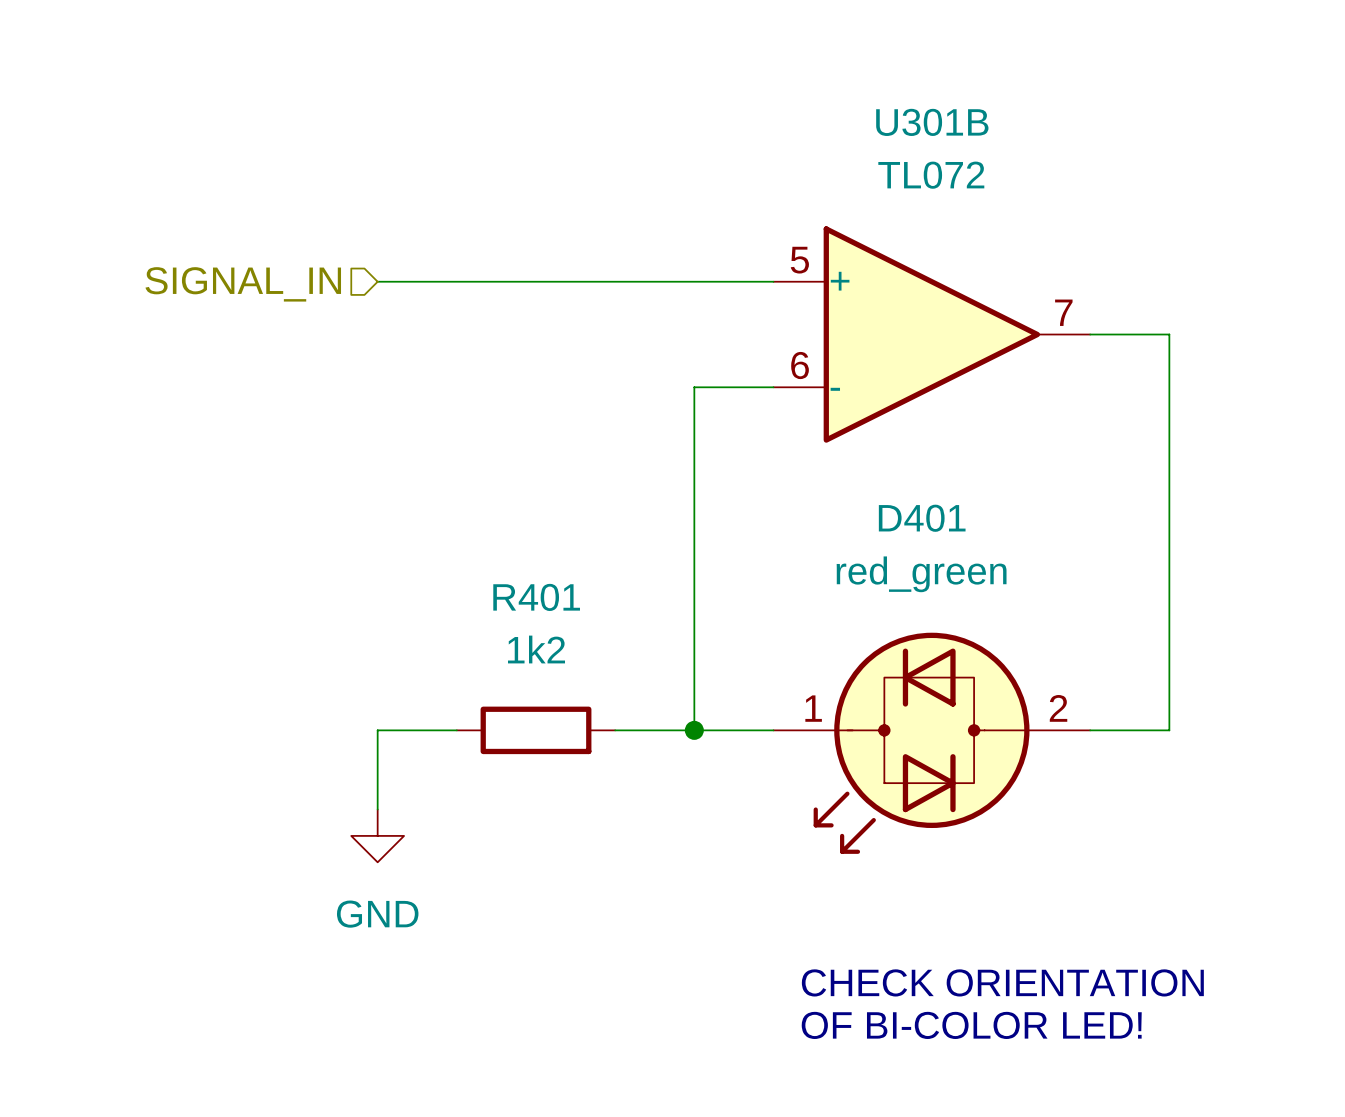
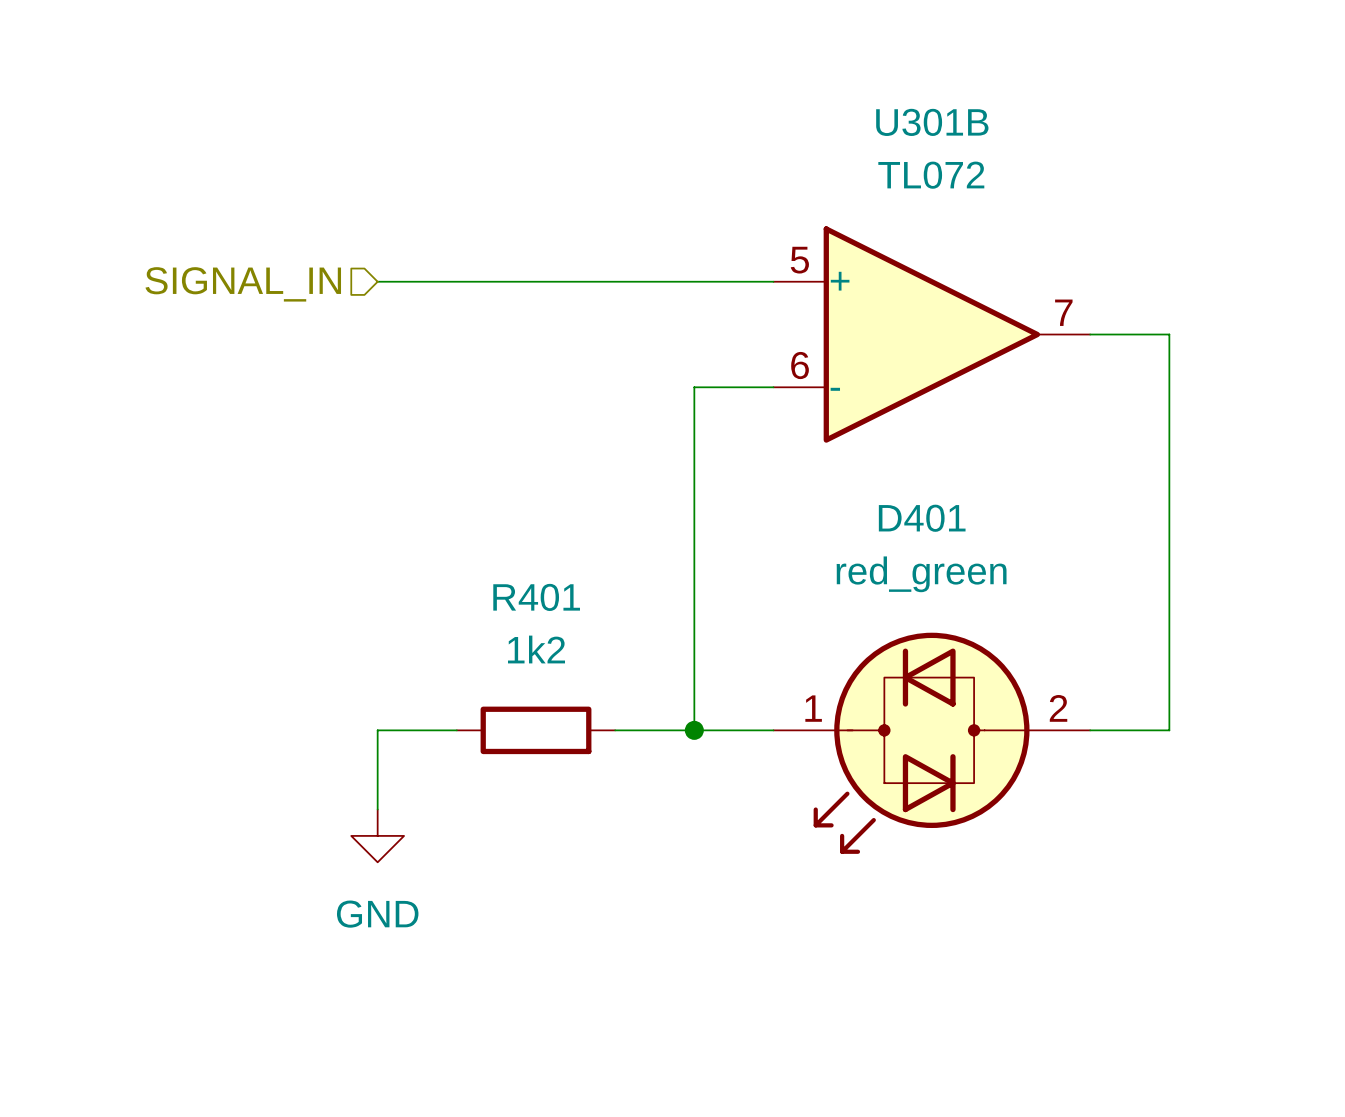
text: CHECK ORIENTATION (1002, 982) -> none
text: OF BI-COLOR LED! (971, 1025) -> none

